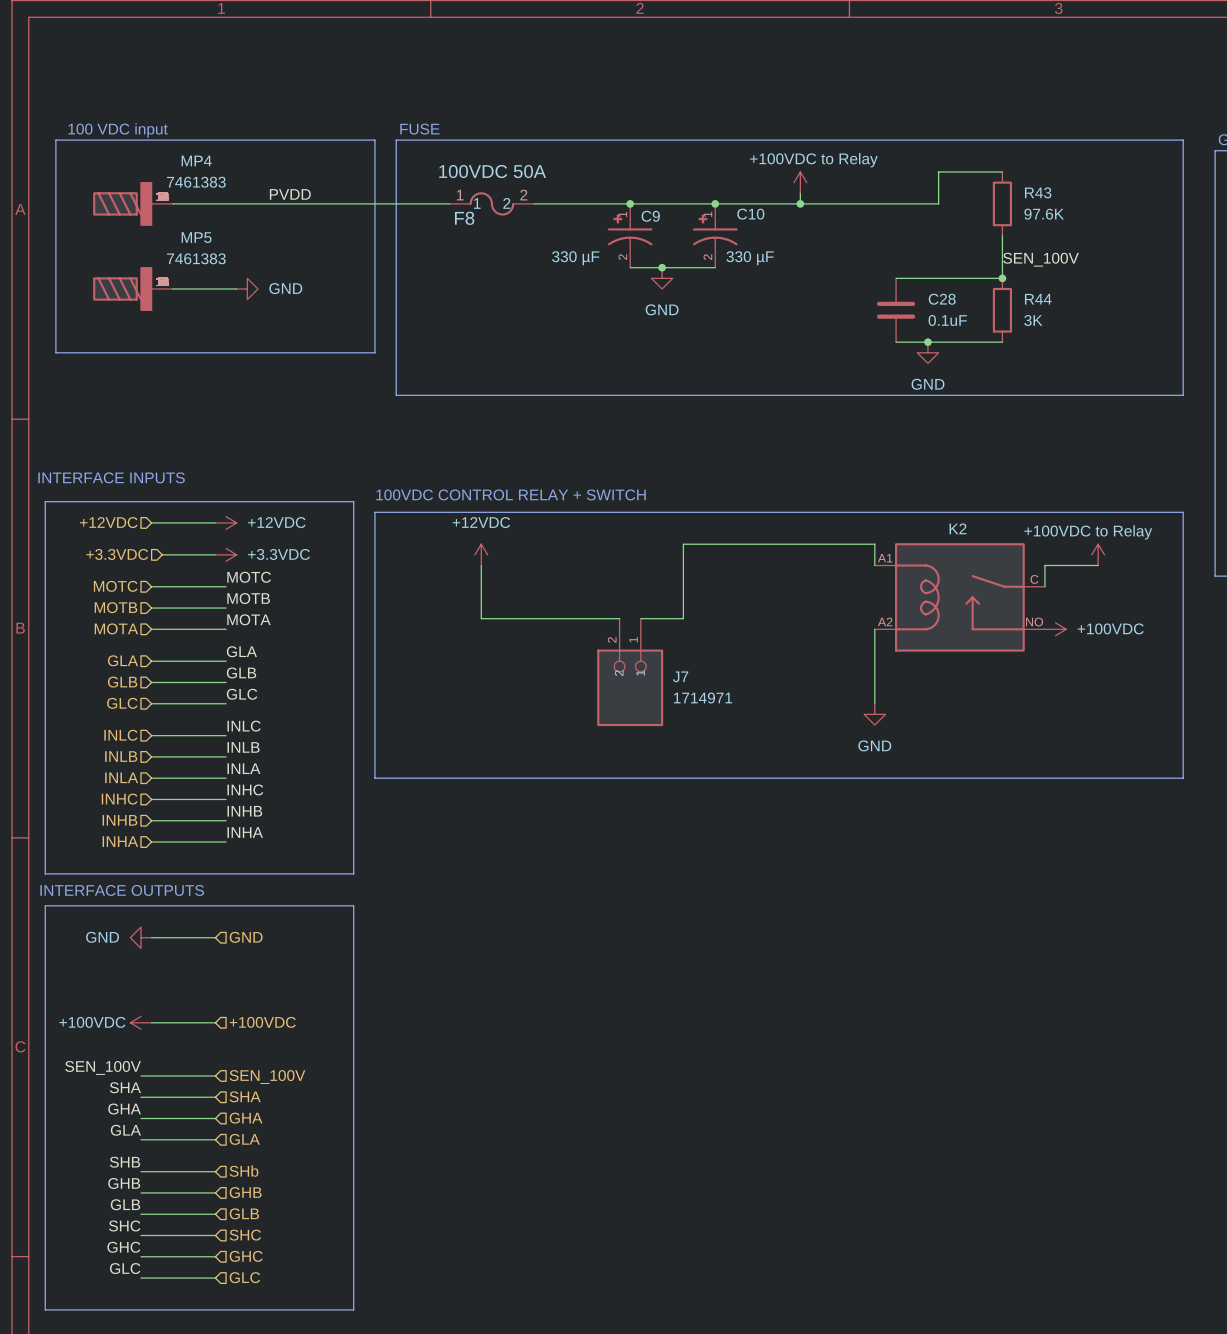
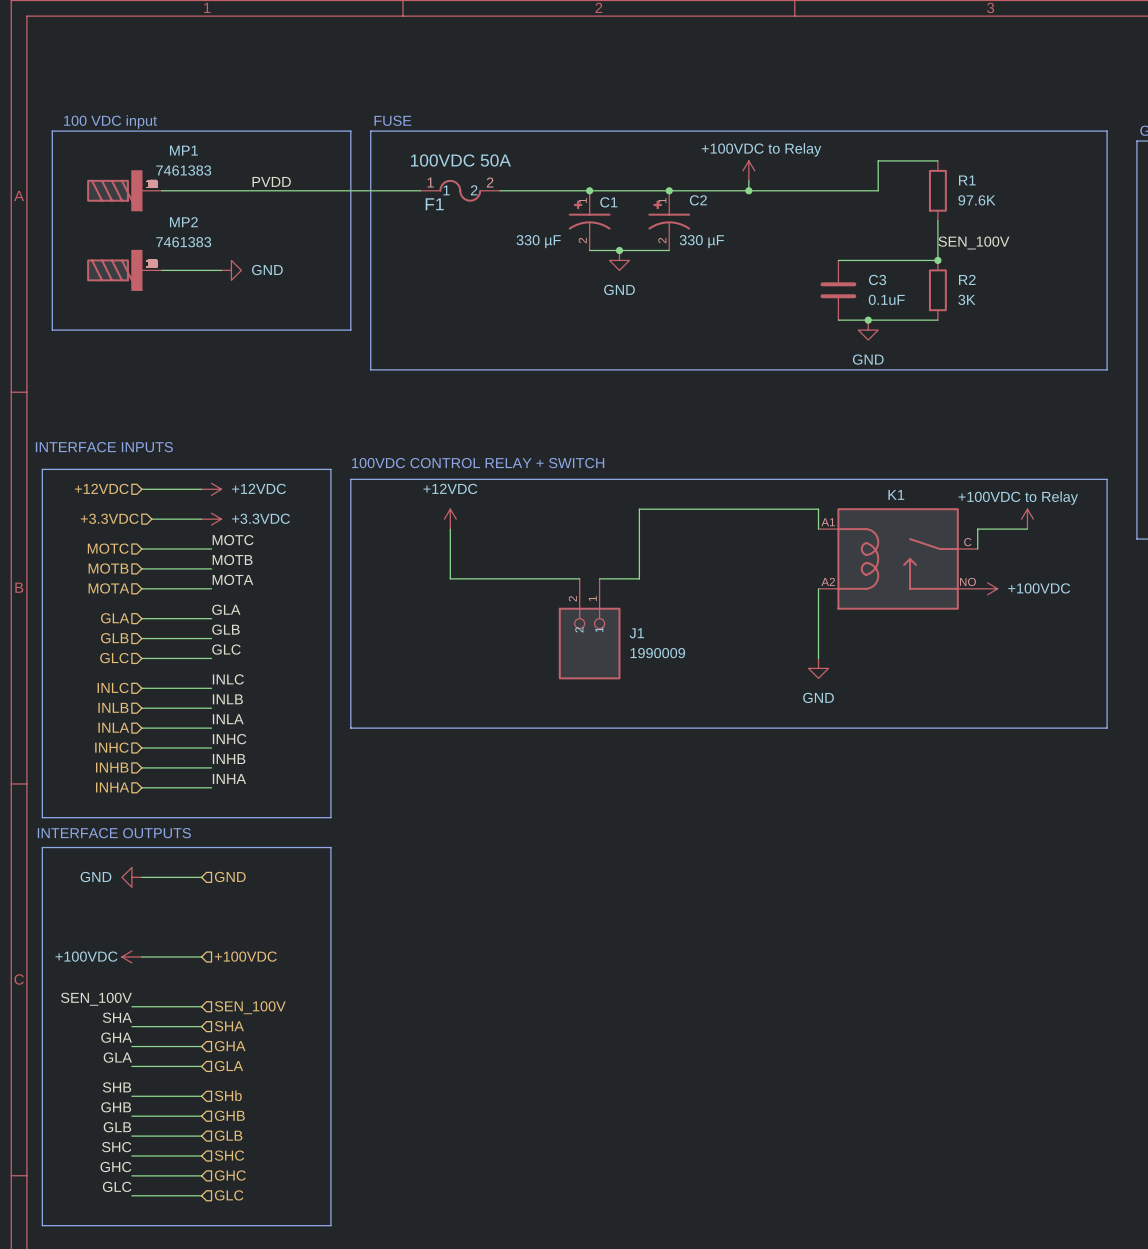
MP4 name: MP4 (196, 160) -> MP1 (183, 150)
R43 name: R43 (1038, 192) -> R1 (967, 180)
C10 name: C10 (750, 214) -> C2 (698, 200)
C9 name: C9 (650, 216) -> C1 (608, 202)
F8 name: F8 (464, 218) -> F1 (434, 204)
MP5 name: MP5 (196, 237) -> MP2 (183, 222)
C28 name: C28 (942, 299) -> C3 (877, 279)
R44 name: R44 (1038, 299) -> R2 (967, 279)
K2 name: K2 (958, 528) -> K1 (896, 494)
J7 name: J7 (680, 676) -> J1 (636, 633)
J7 value: 1714971 (703, 698) -> 1990009 (657, 653)

